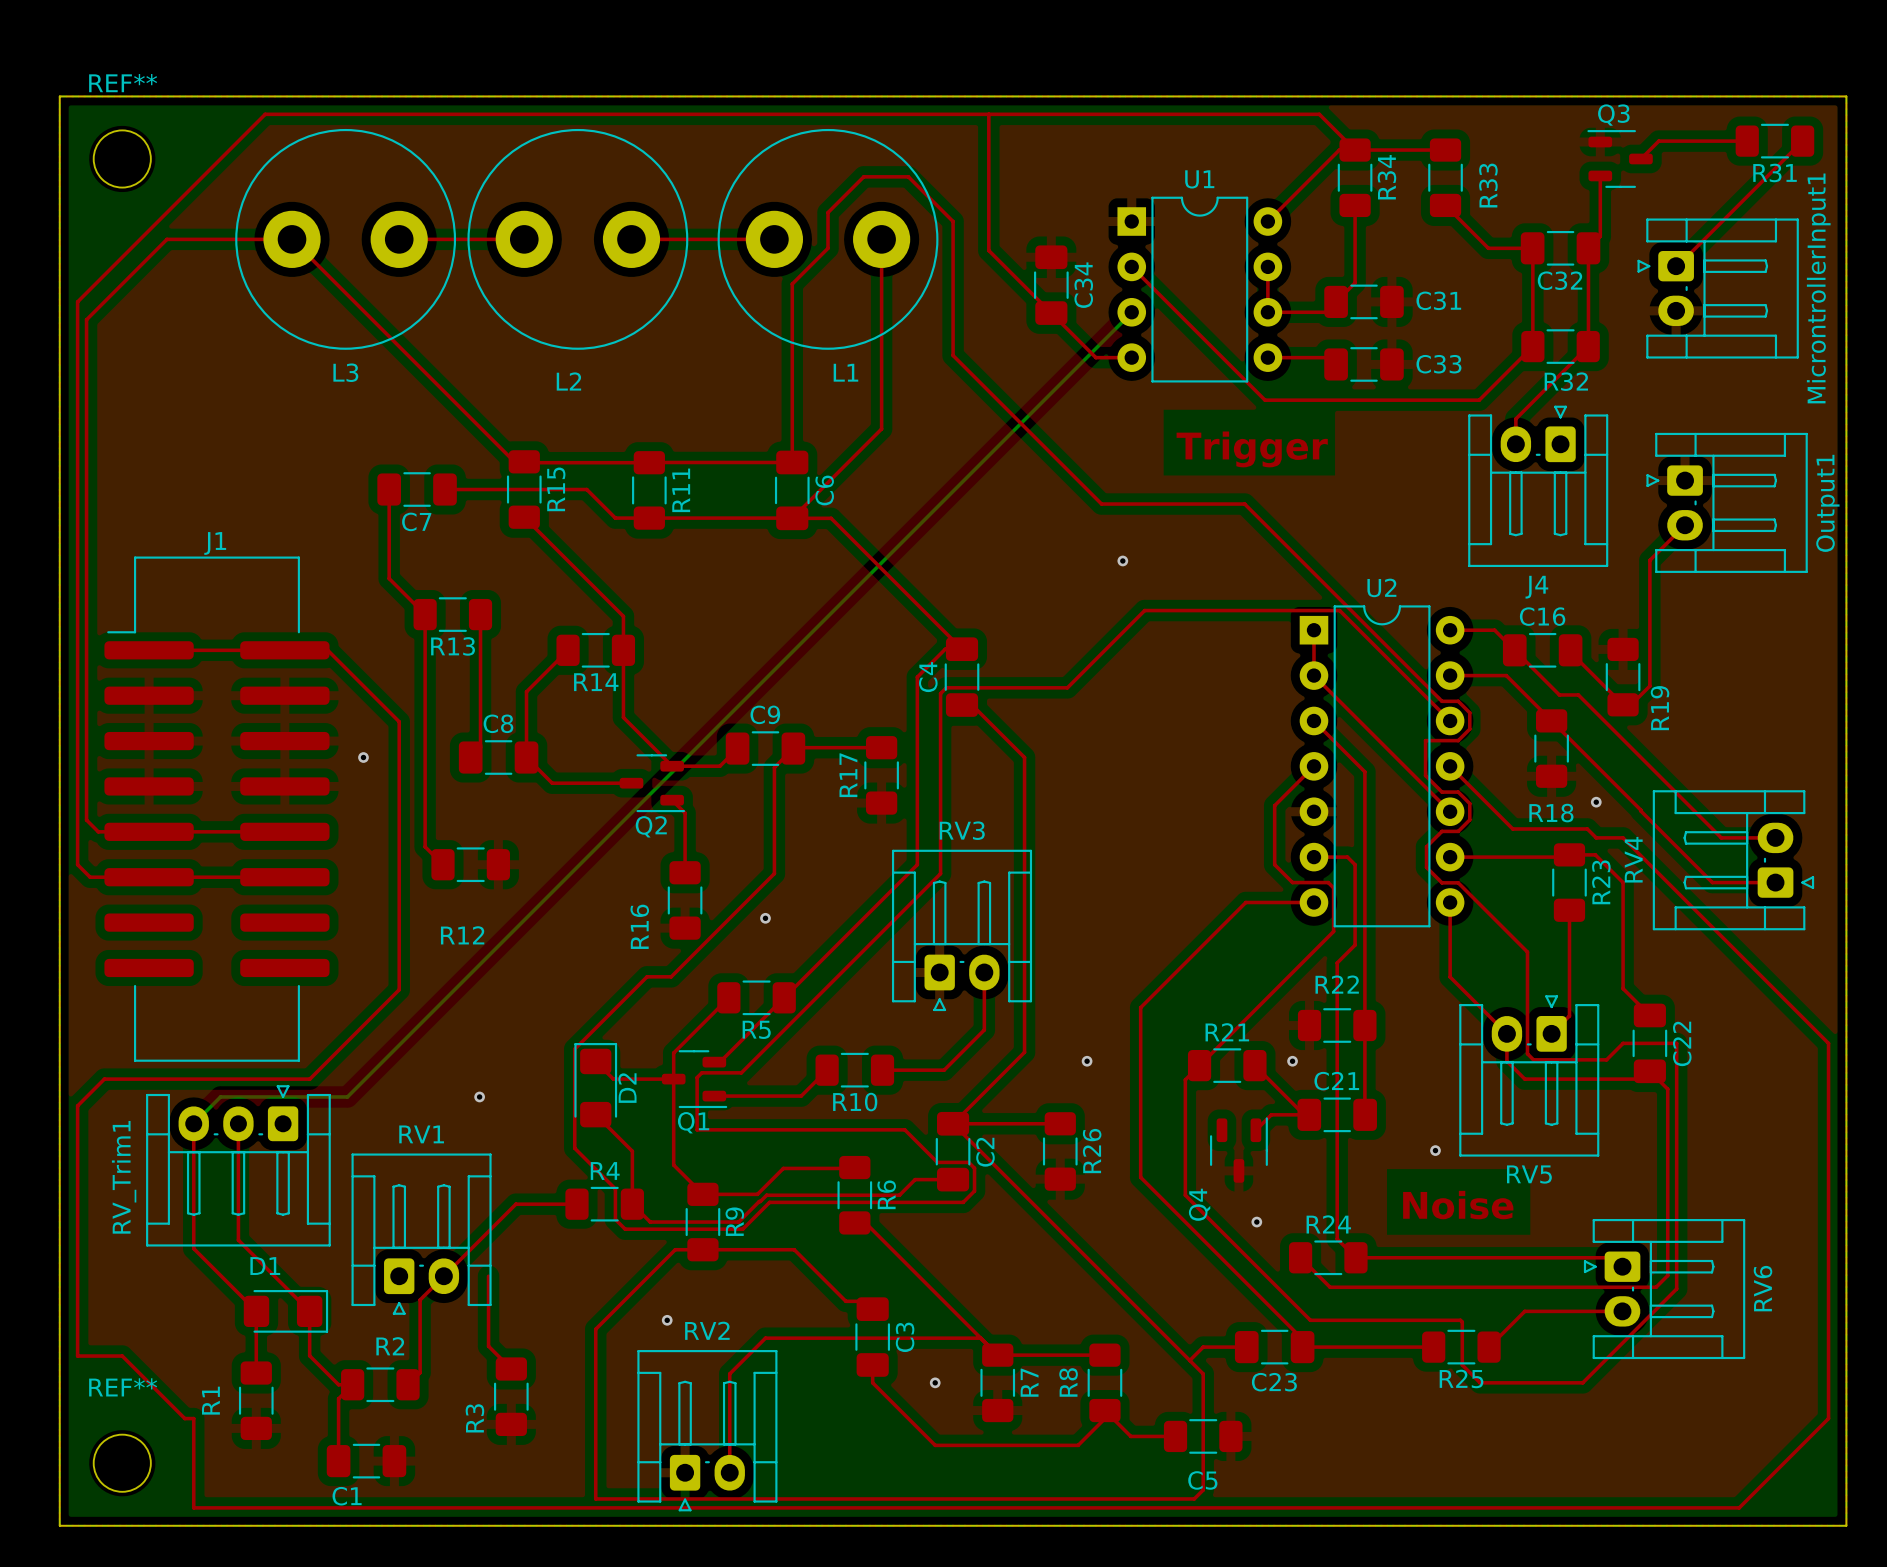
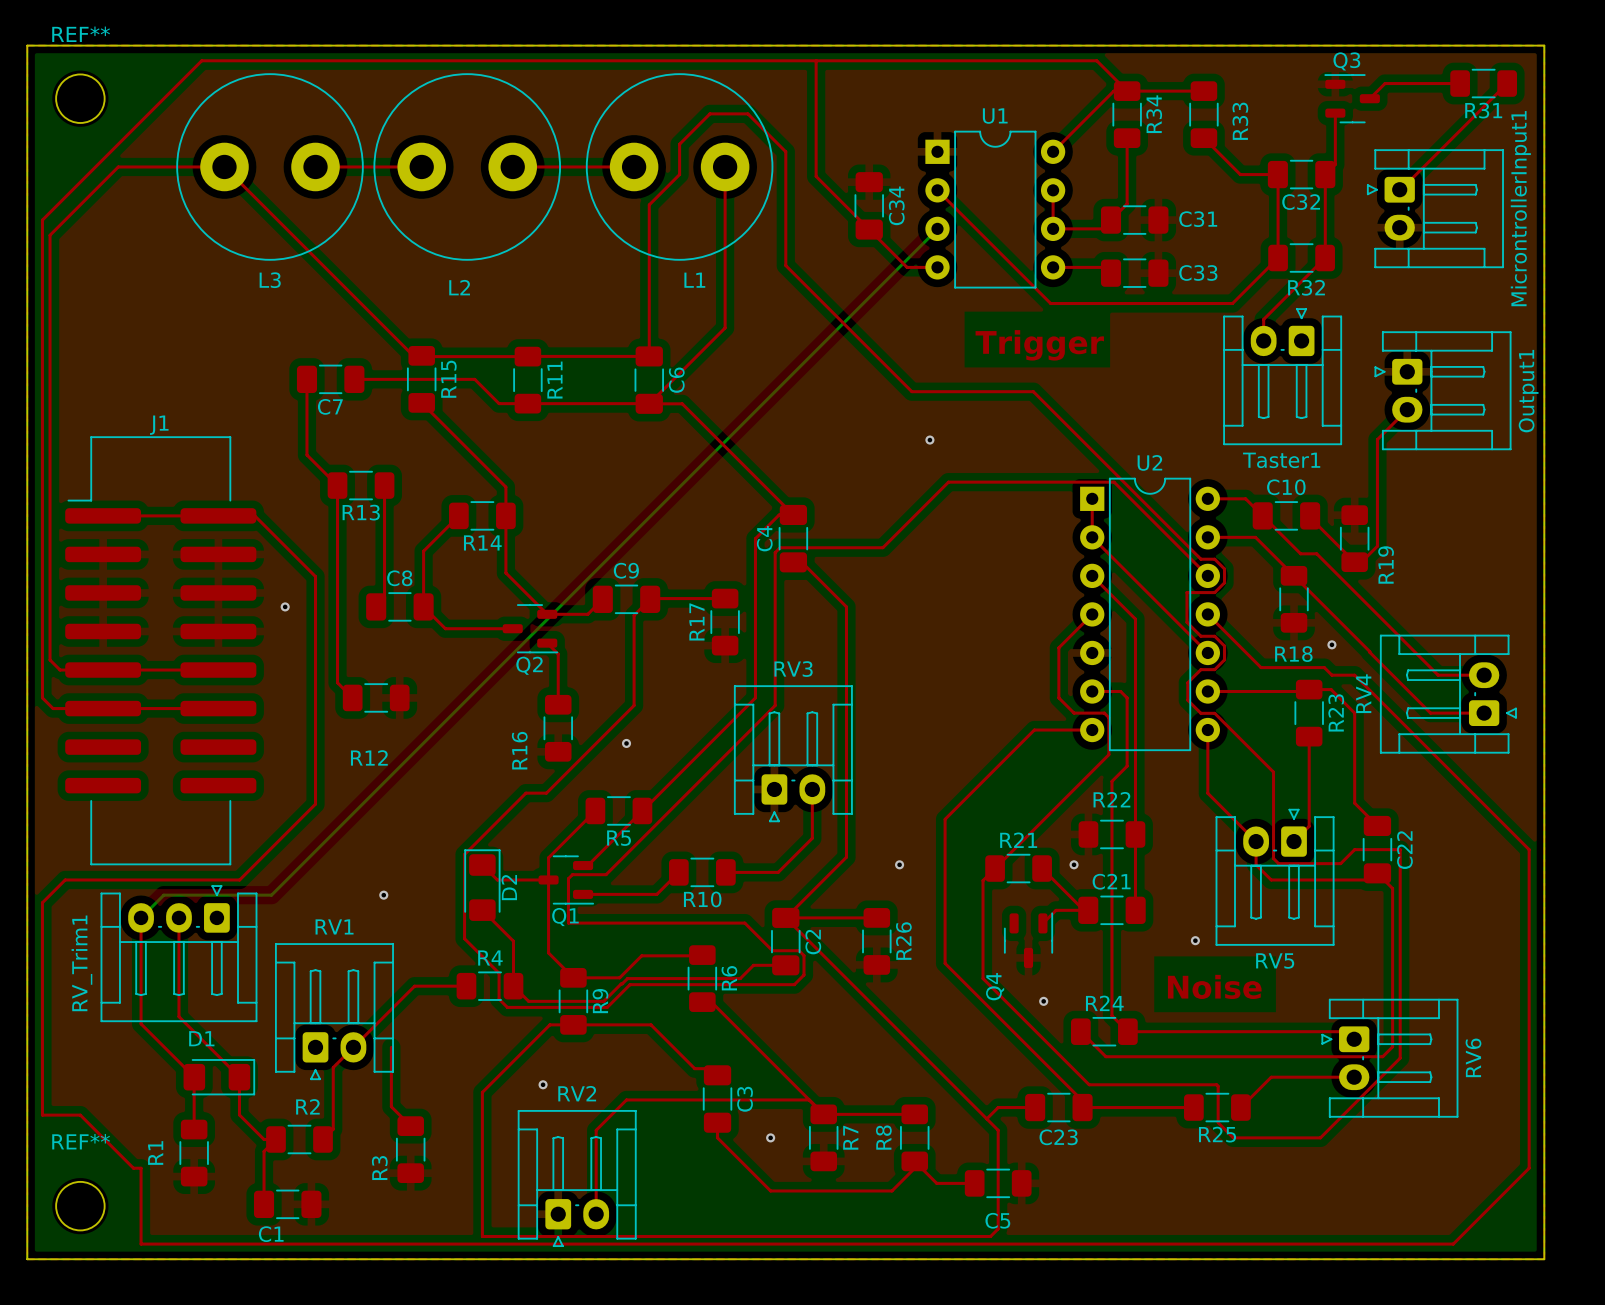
J4 name: J4 (1536, 587) -> Taster1 (1281, 460)
C16 name: C16 (1542, 616) -> C10 (1286, 487)

